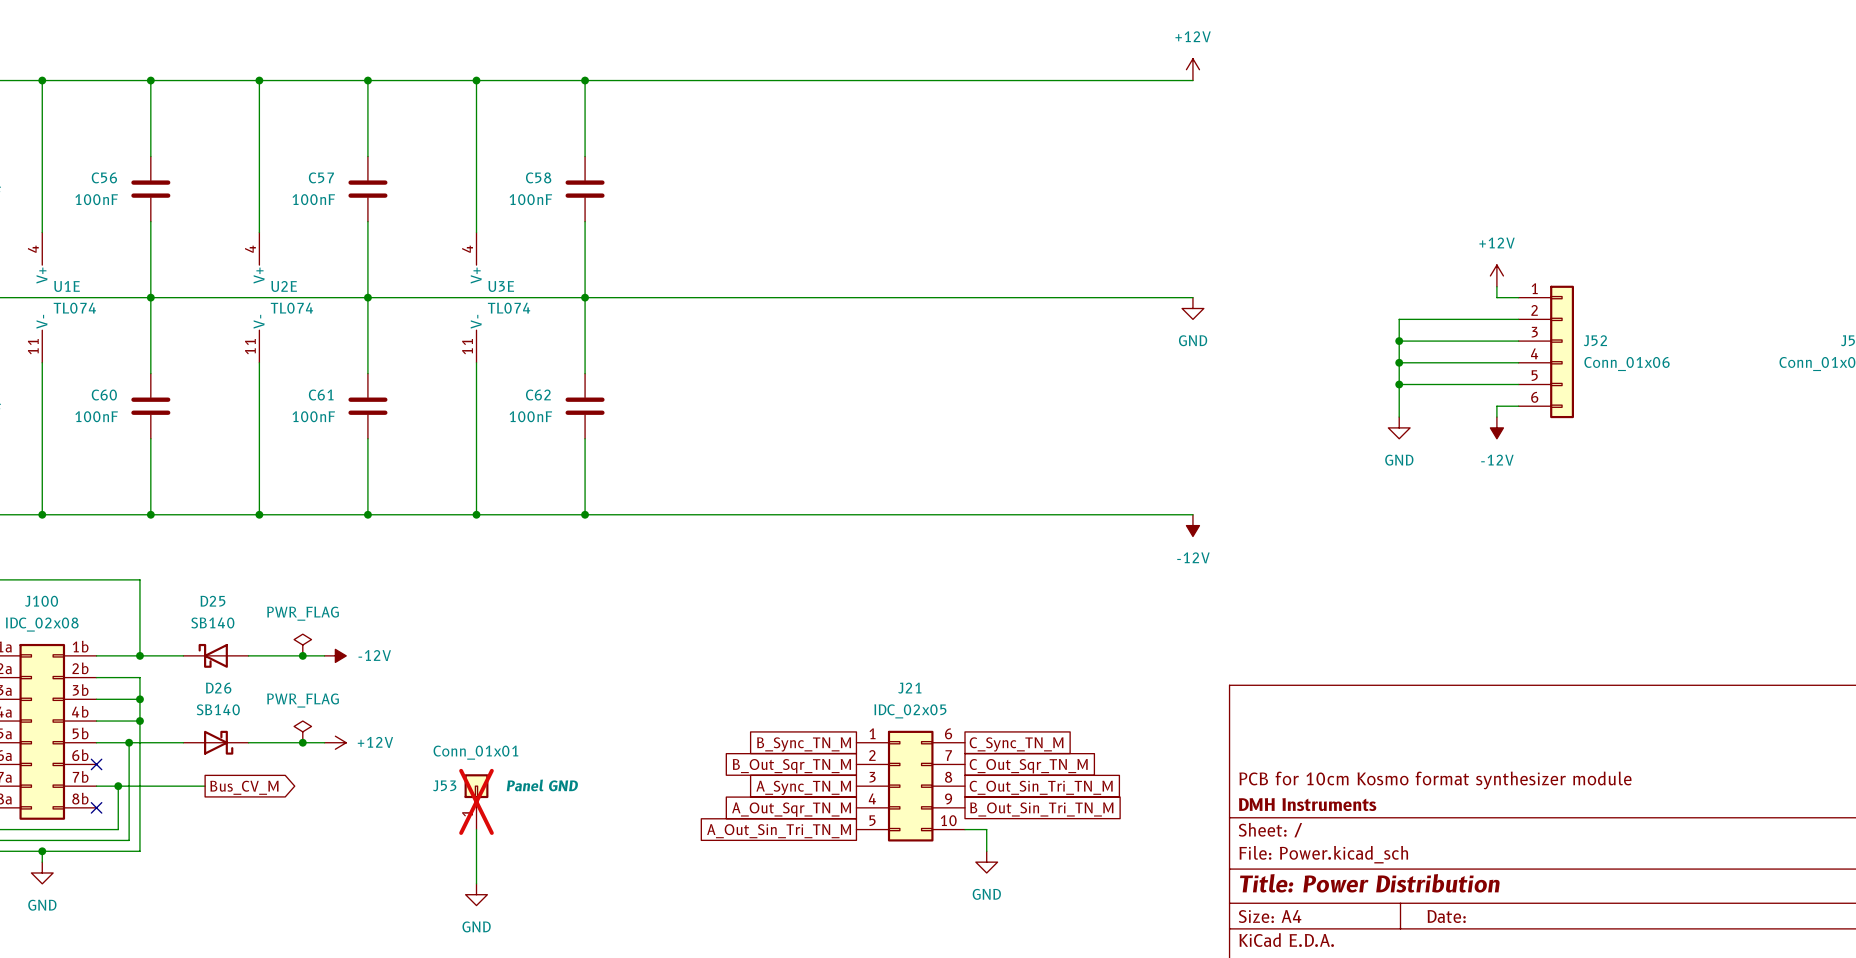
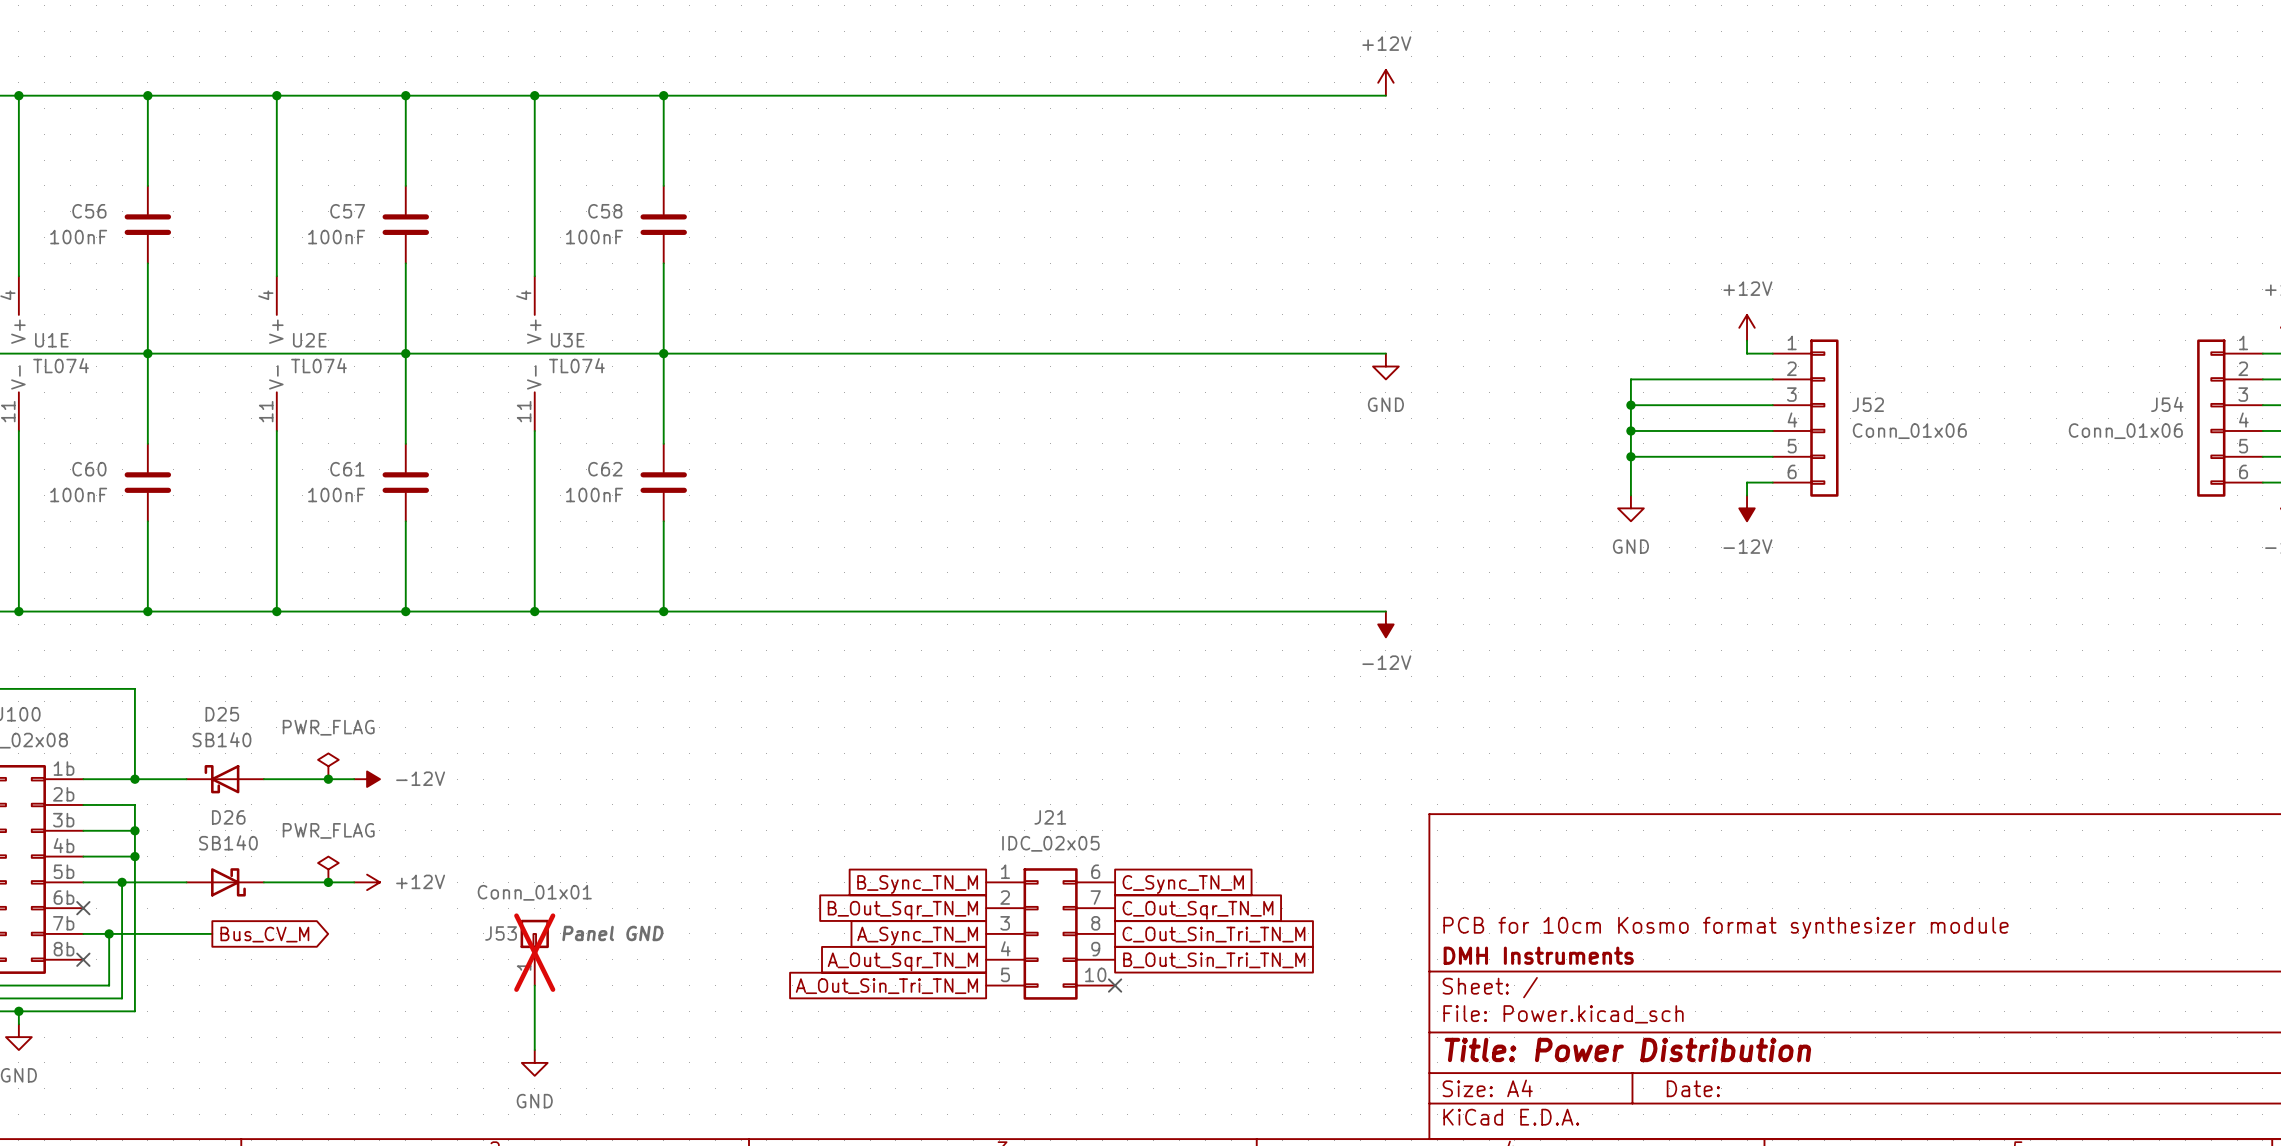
wire: (964, 829) (986, 829) (986, 851) -> none
no-connect mark: none -> (1115, 985)
power symbol: GND (986, 862) -> none

